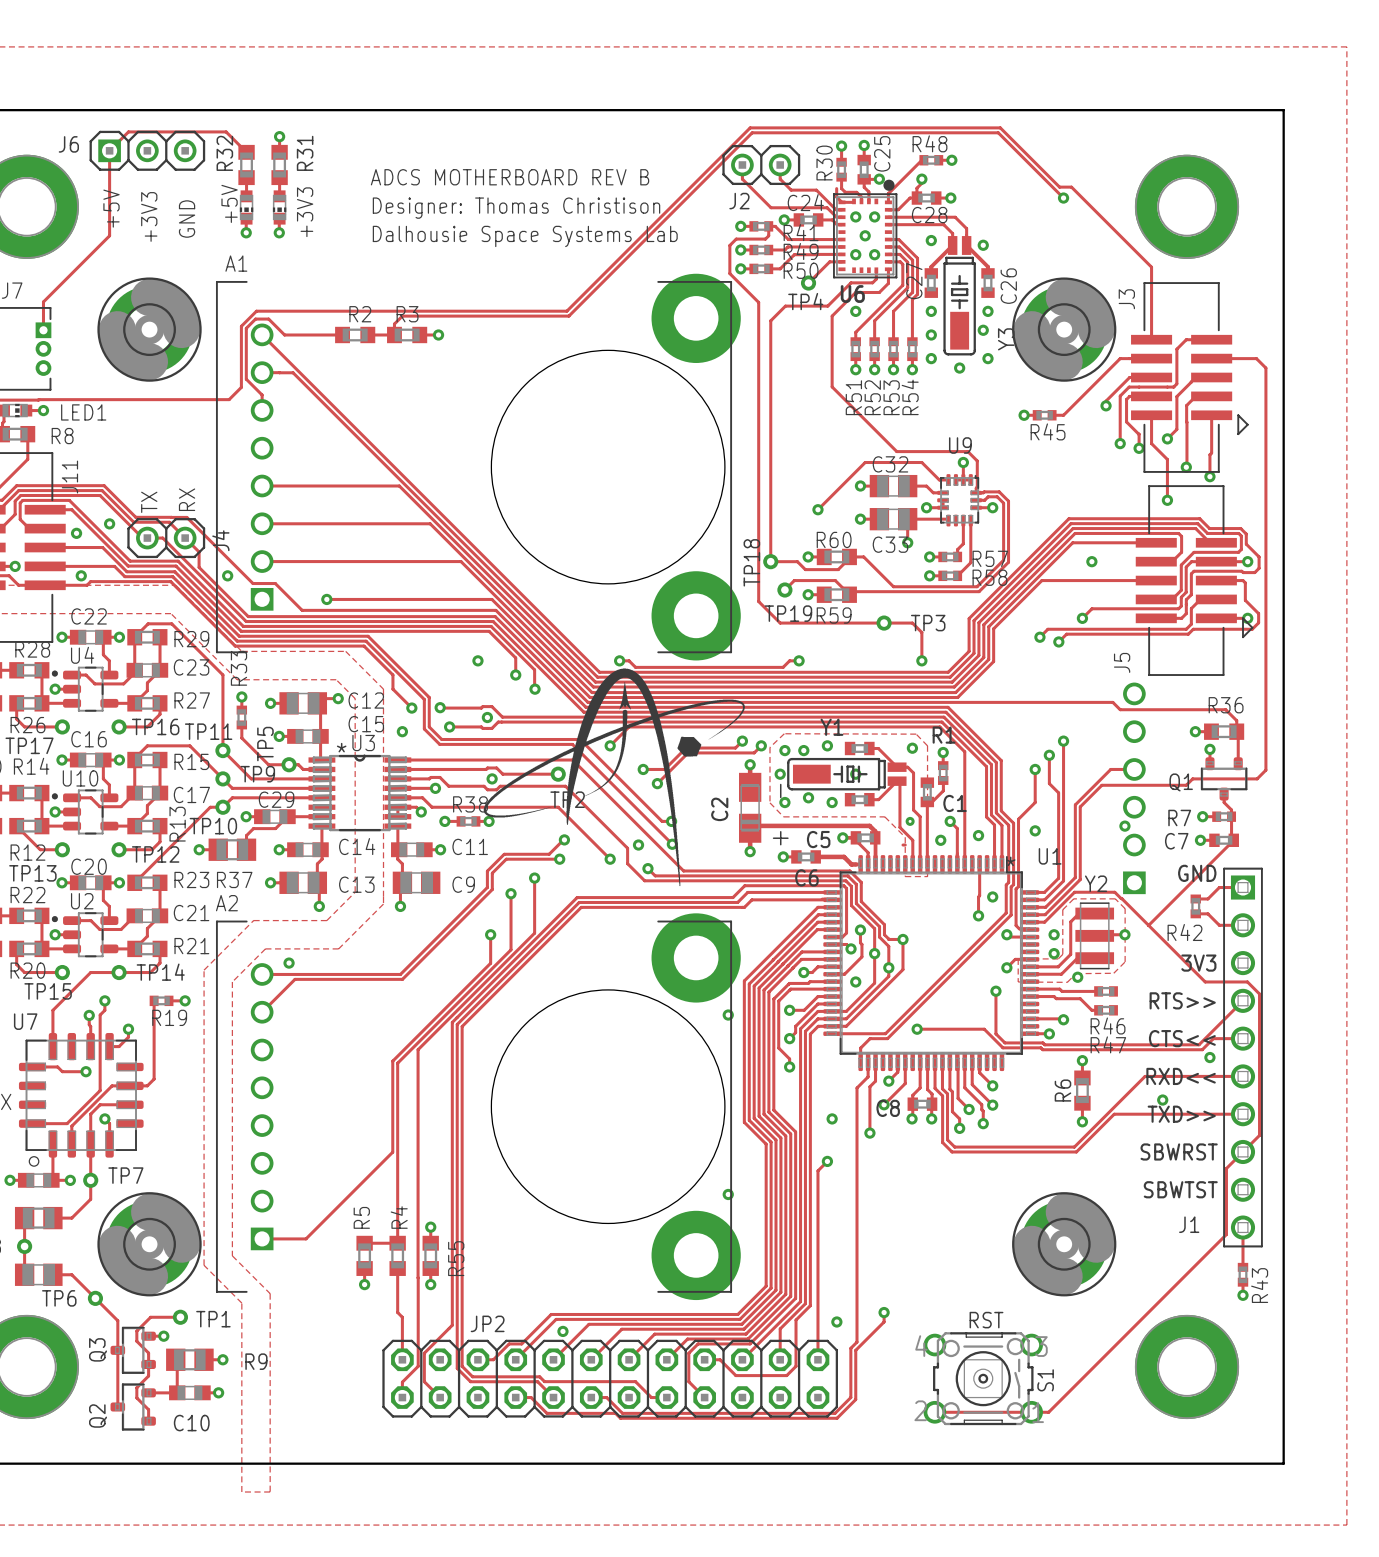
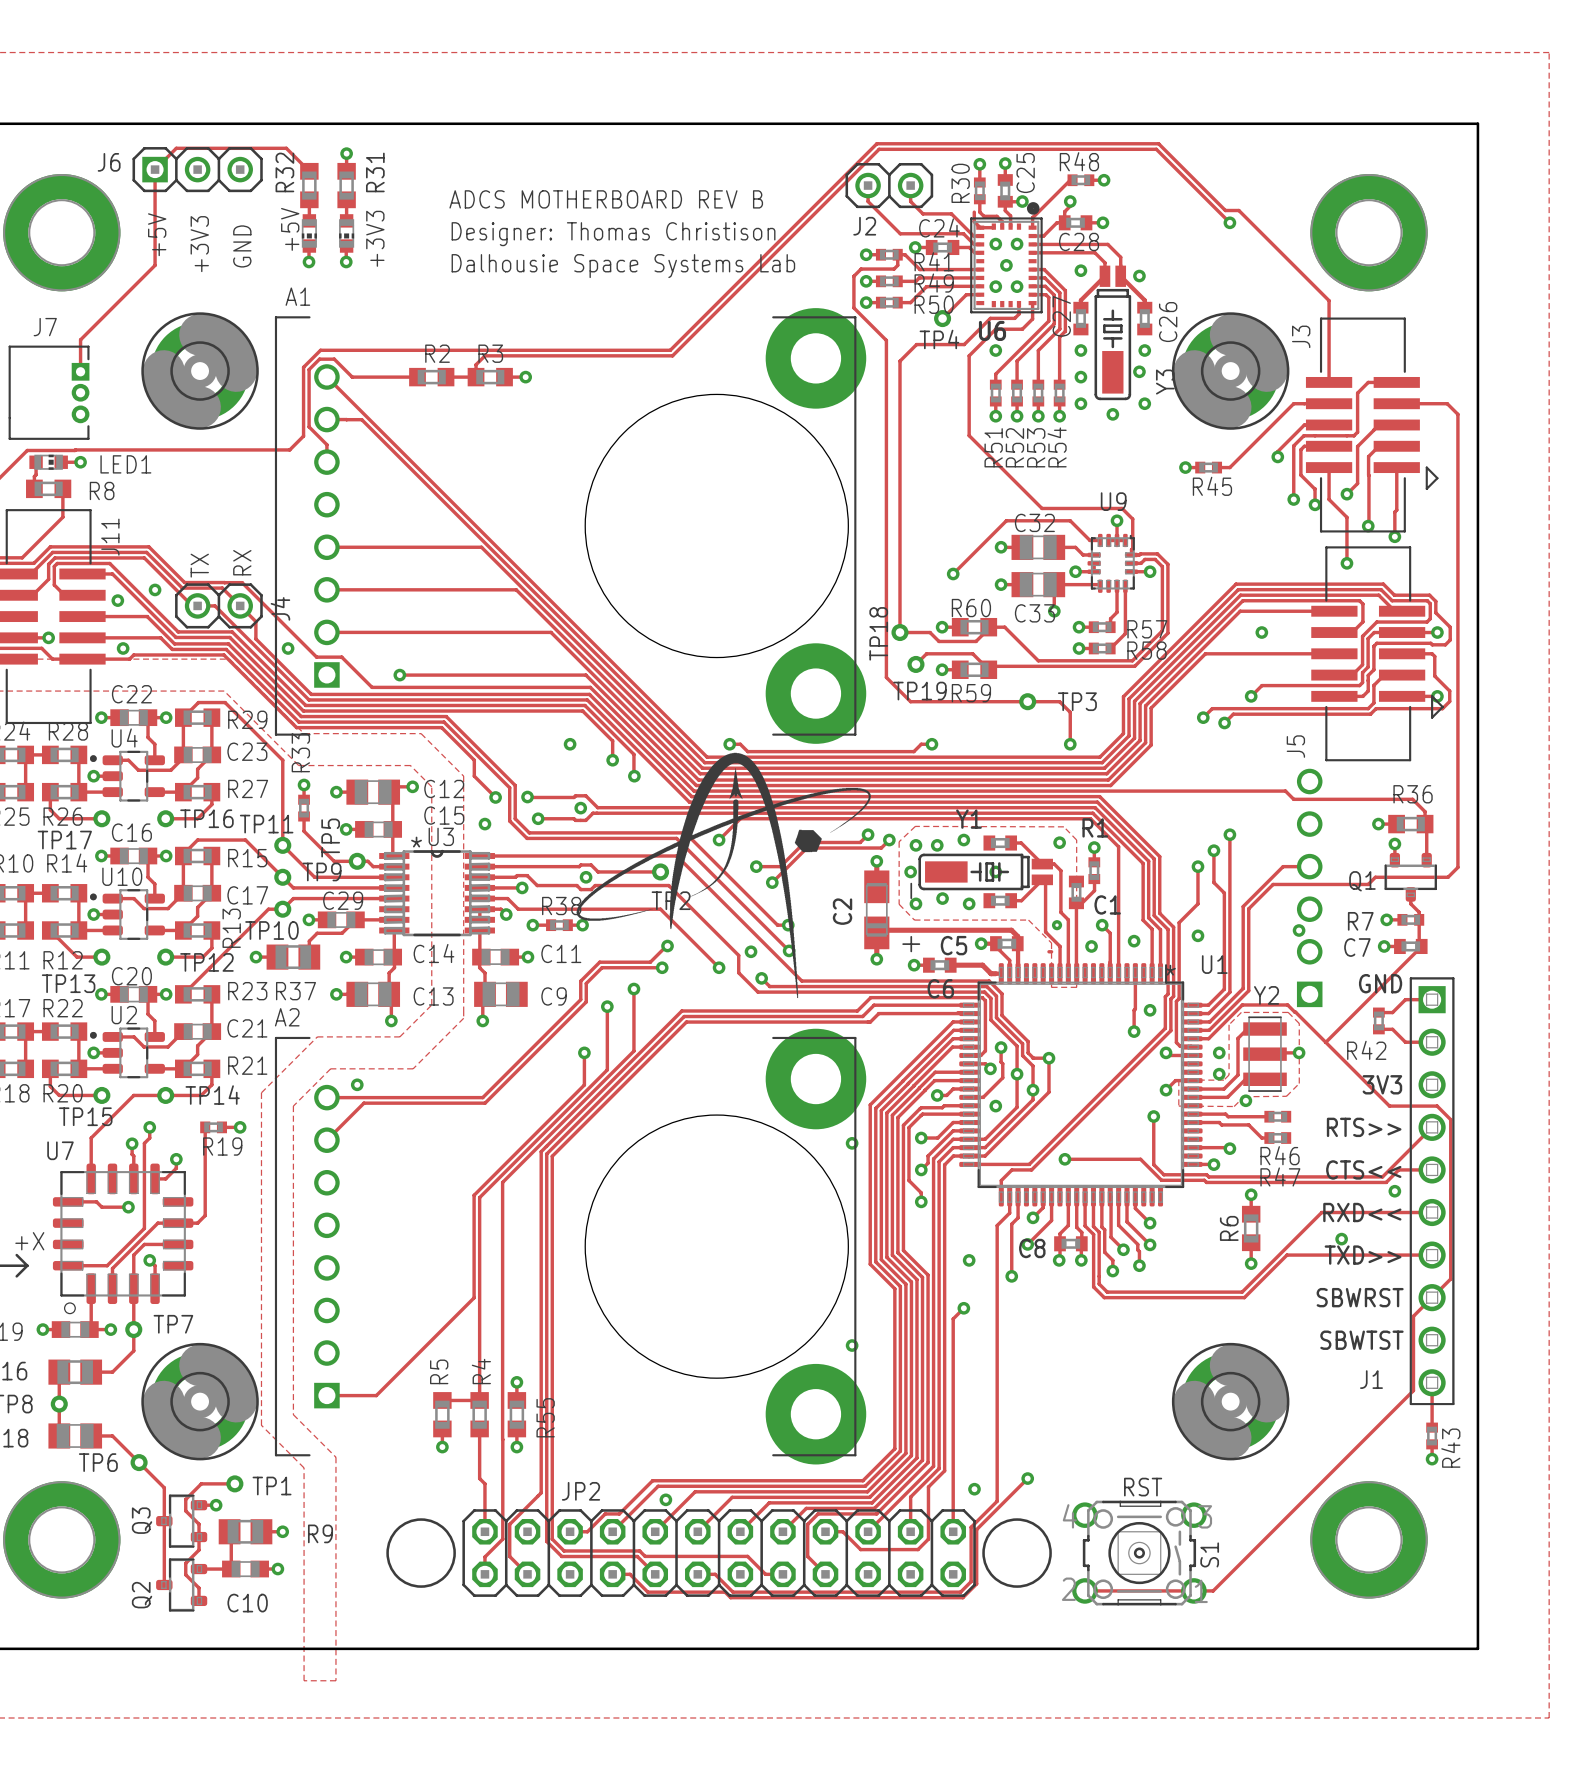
track: (884, 1312) (884, 1321) (855, 1350) (855, 1399) (837, 1418) (826, 1418) -> (1027, 1478) (976, 1529) (976, 1583) (962, 1597)
track: (857, 1332) (857, 1342) (850, 1348) (850, 1397) (835, 1413) (824, 1413) -> (997, 1501) (971, 1527) (971, 1581) (960, 1592)
drawing: none -> [386, 1518, 456, 1588]
drawing: none -> [982, 1518, 1052, 1588]

